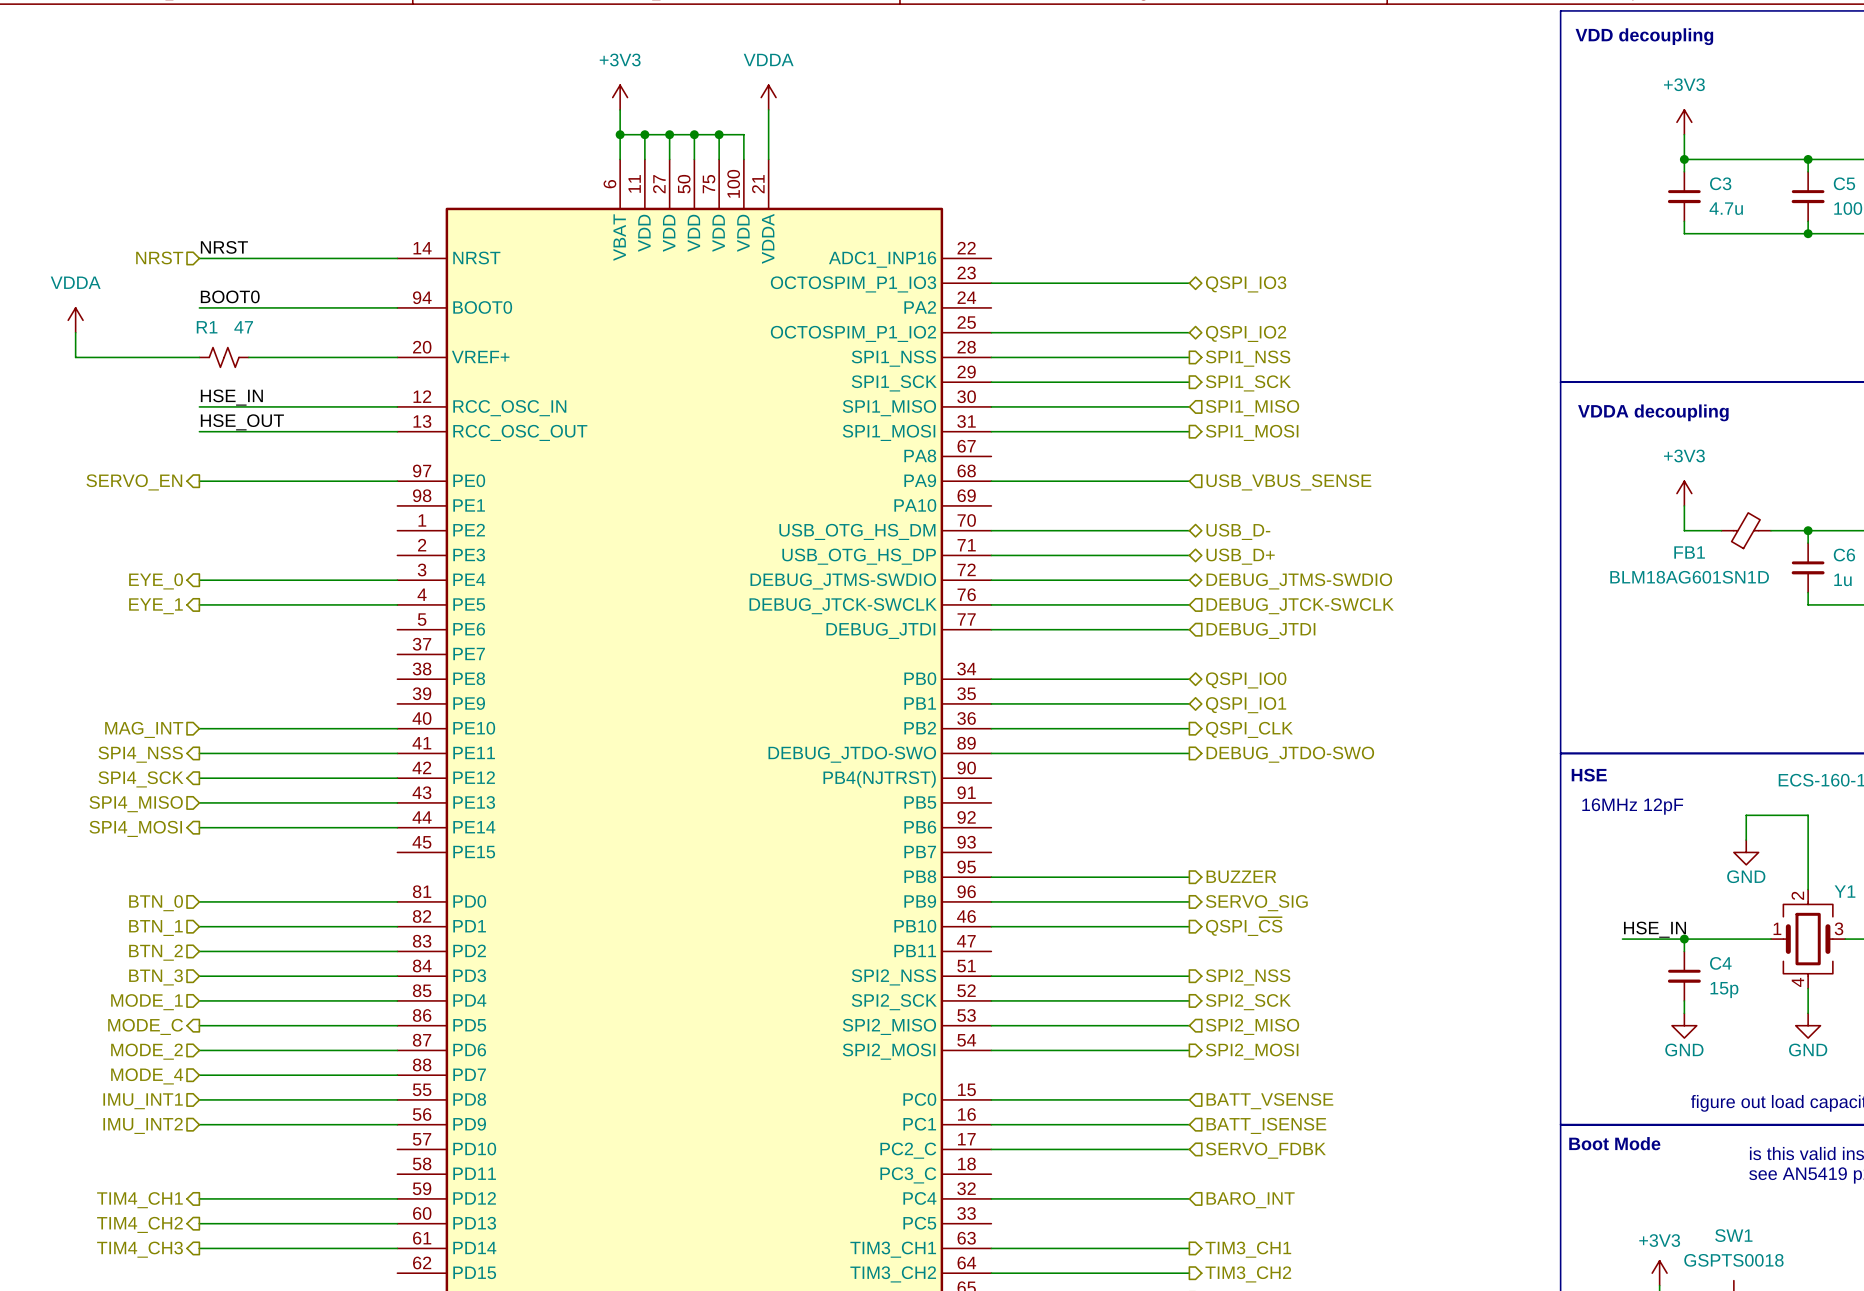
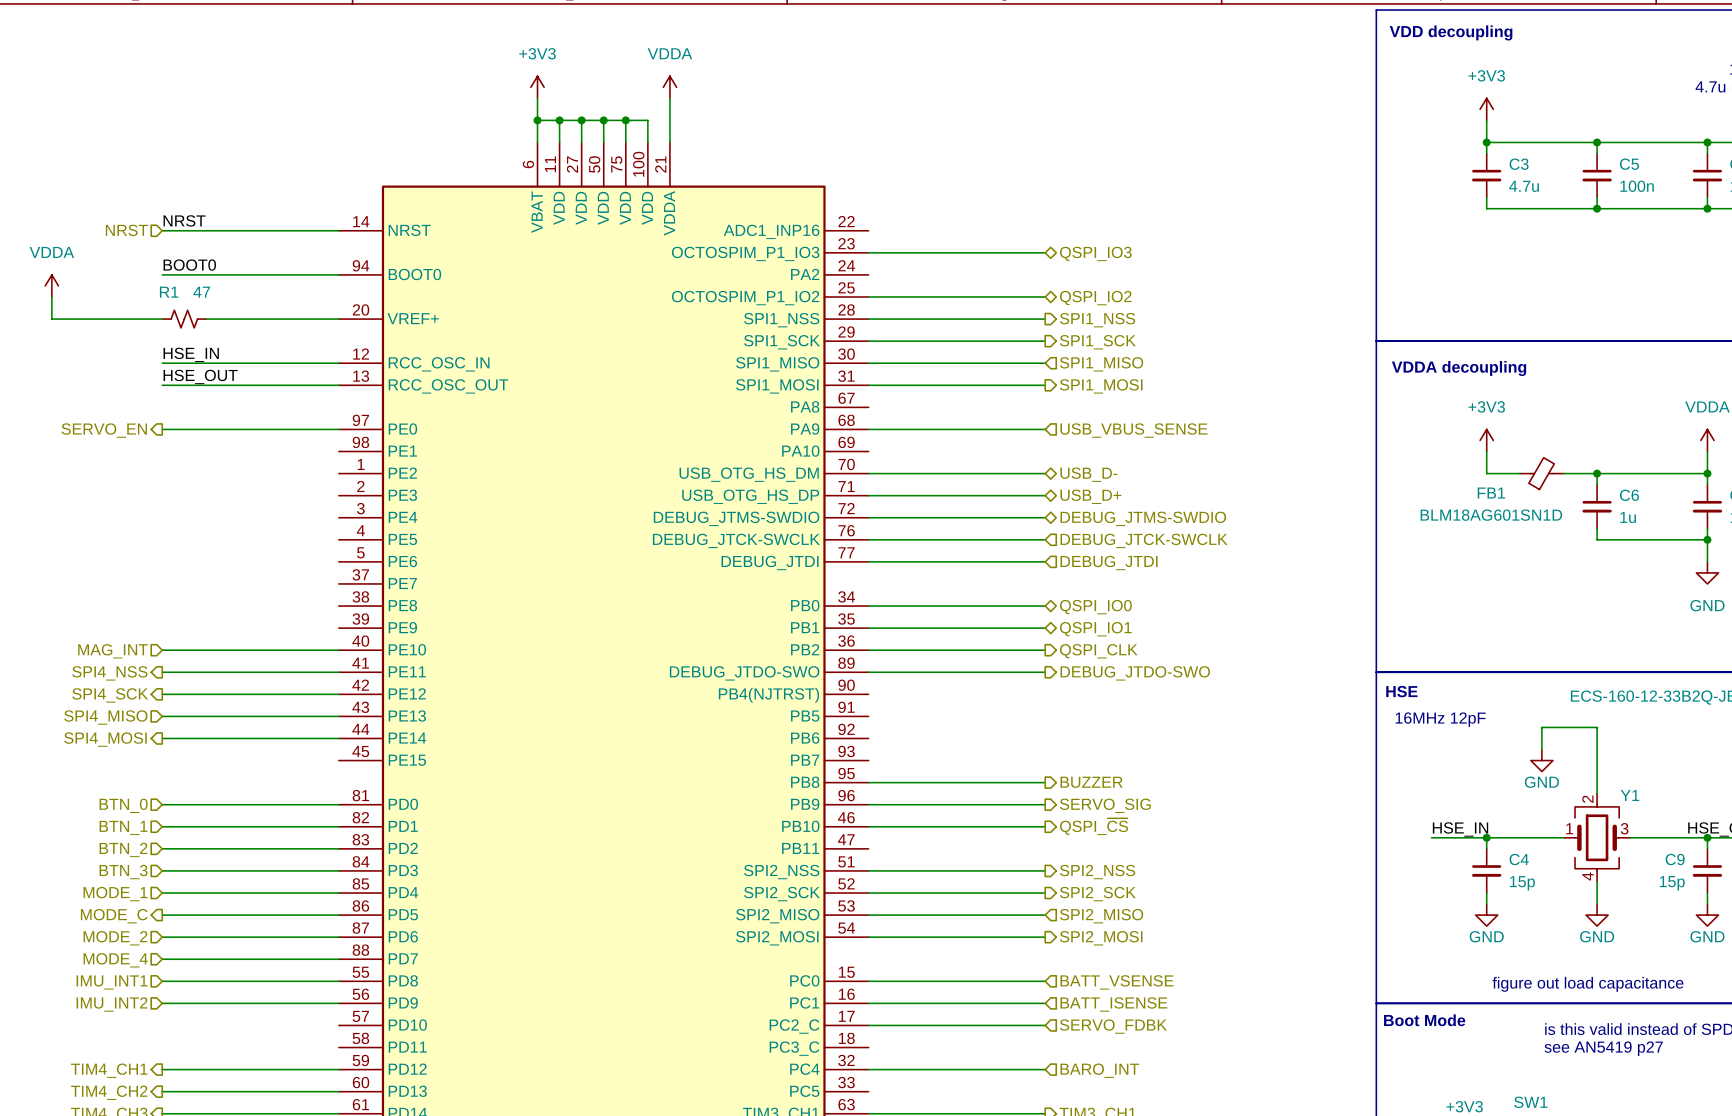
wire: (199, 580) (397, 580) -> none
hierarchical label: EYE_0 (156, 581) -> none
wire: (199, 604) (397, 604) -> none
hierarchical label: EYE_1 (155, 606) -> none

